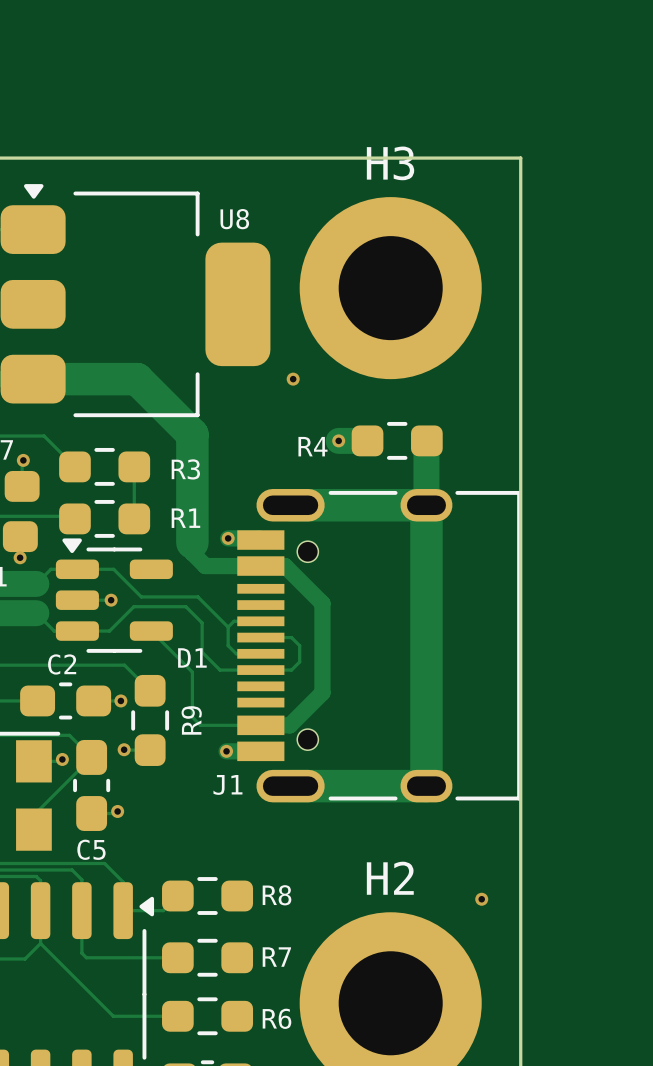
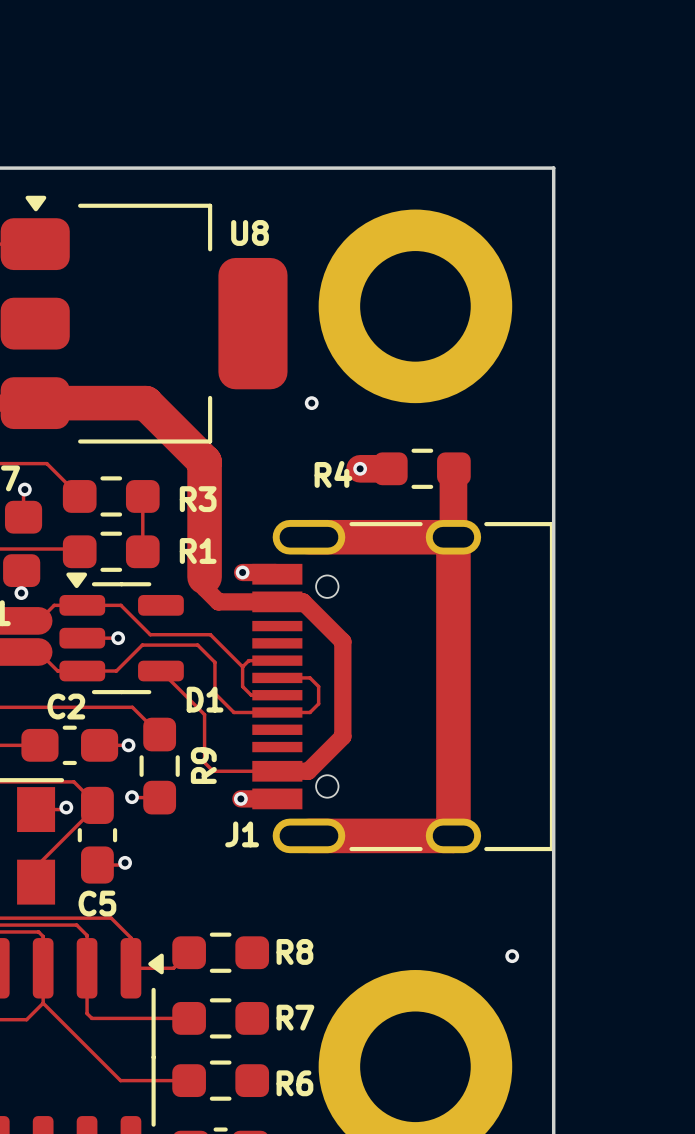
H3 name: H3 (390, 163) -> none
H2 name: H2 (390, 878) -> none

